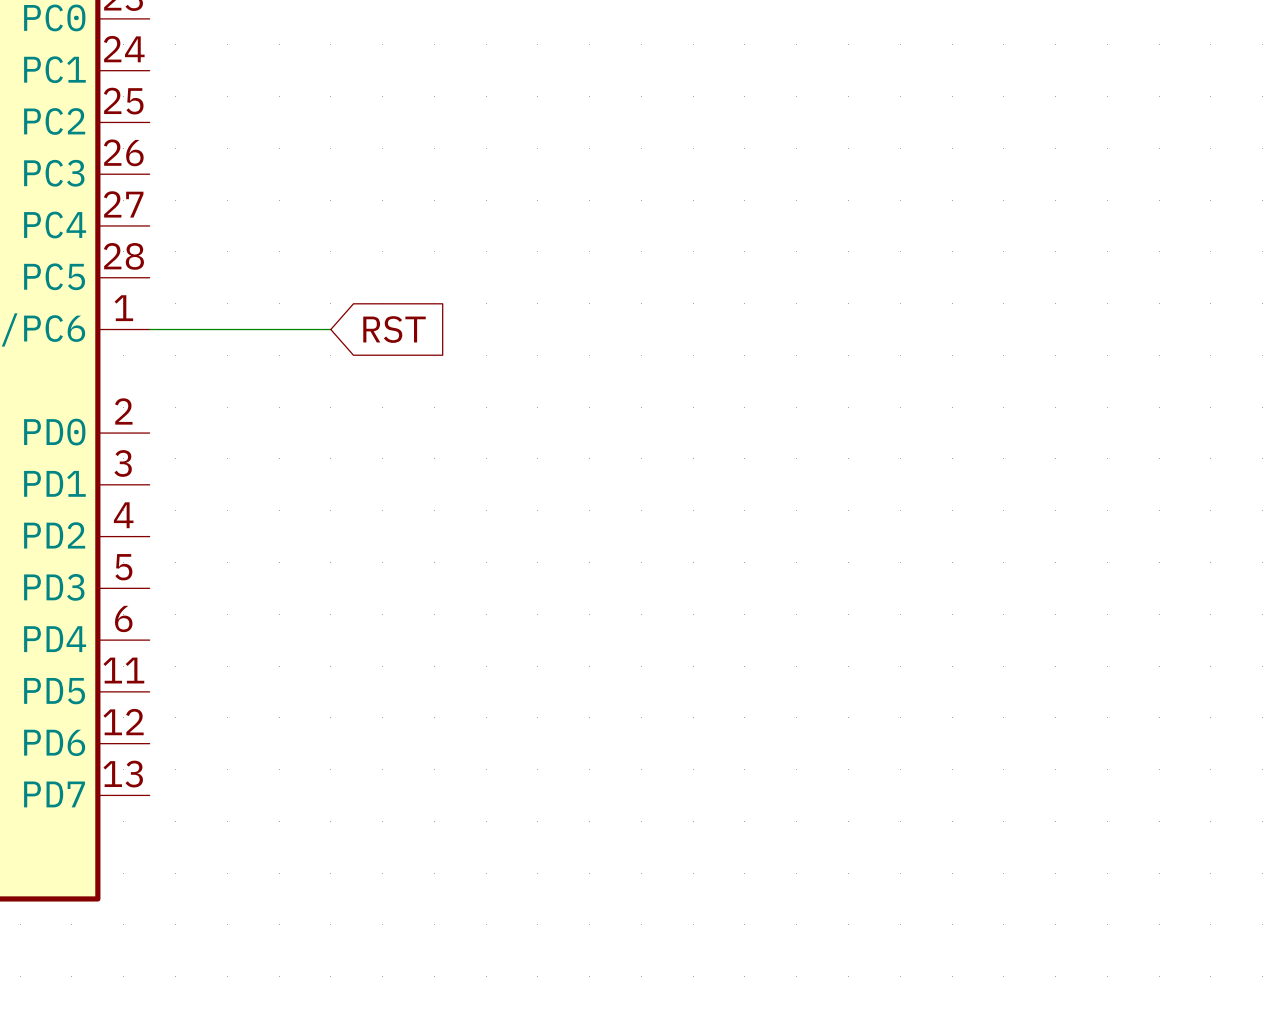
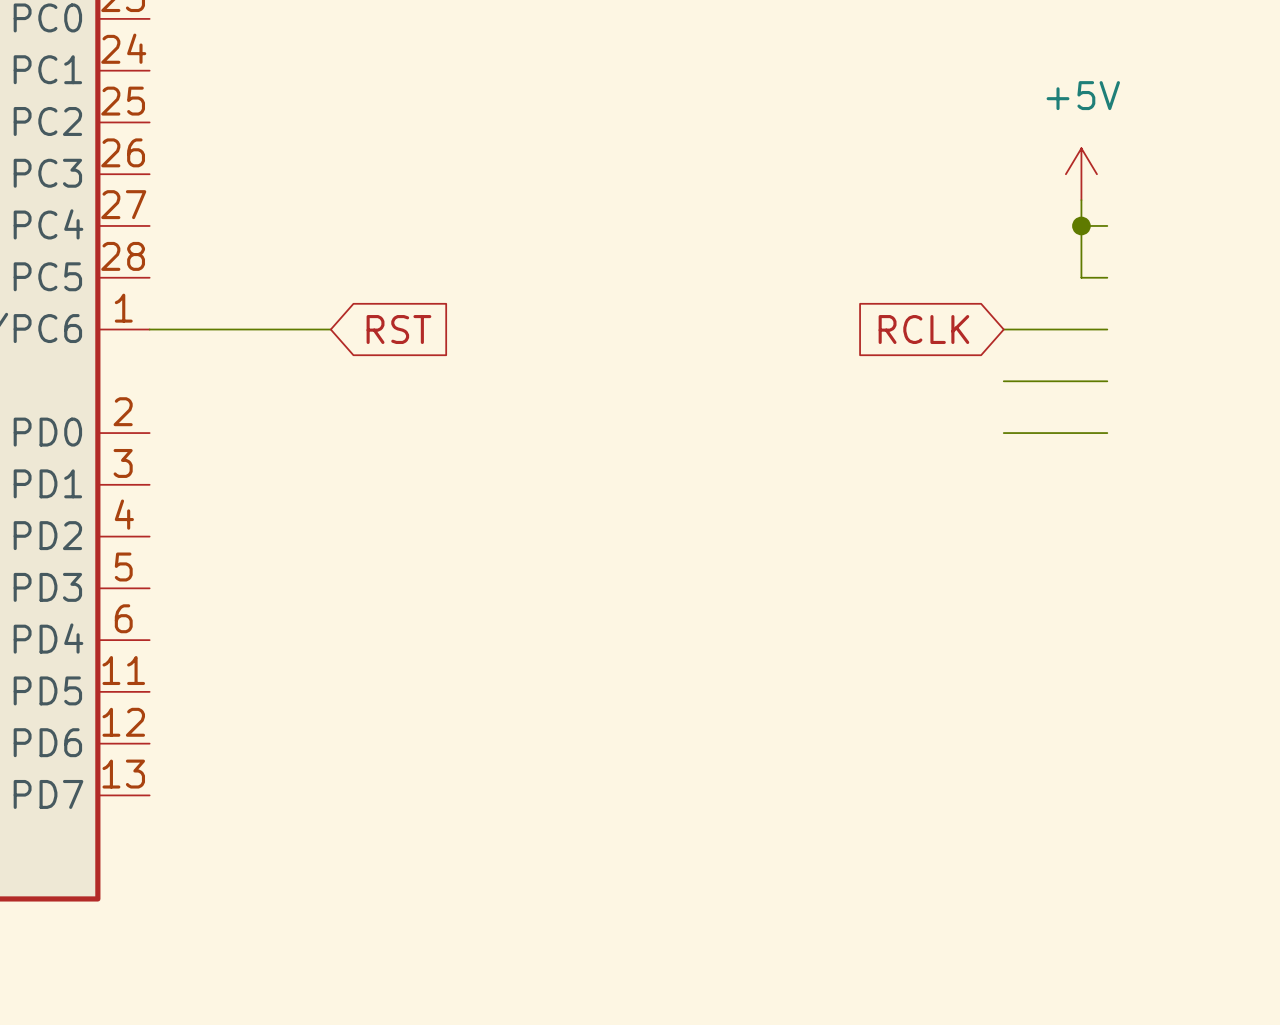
power symbol: none -> +5V (1081, 174)
wire: none -> (1081, 200) (1081, 277) (1107, 277)
wire: none -> (1081, 225) (1107, 225)
junction: none -> (1081, 225)
global label: none -> RCLK (923, 329)
wire: none -> (1003, 329) (1107, 329)
wire: none -> (1003, 381) (1107, 381)
wire: none -> (1003, 433) (1107, 433)

